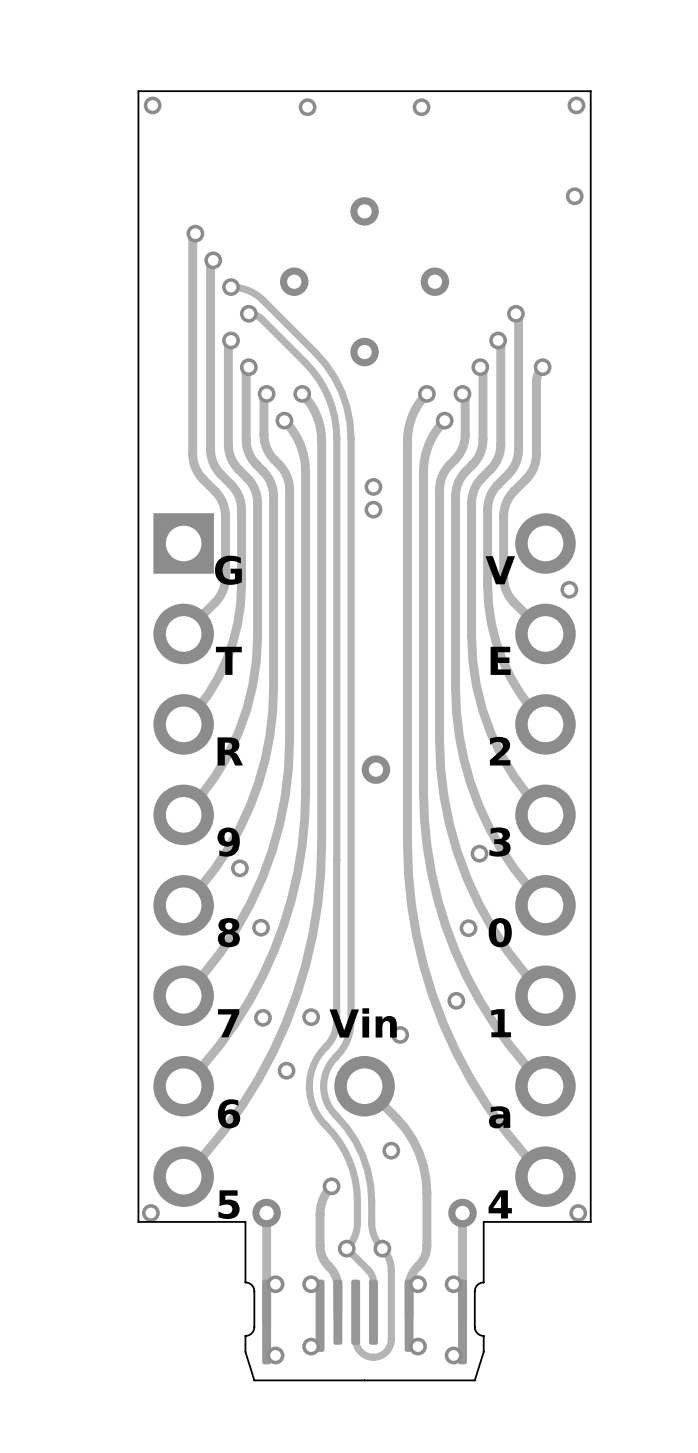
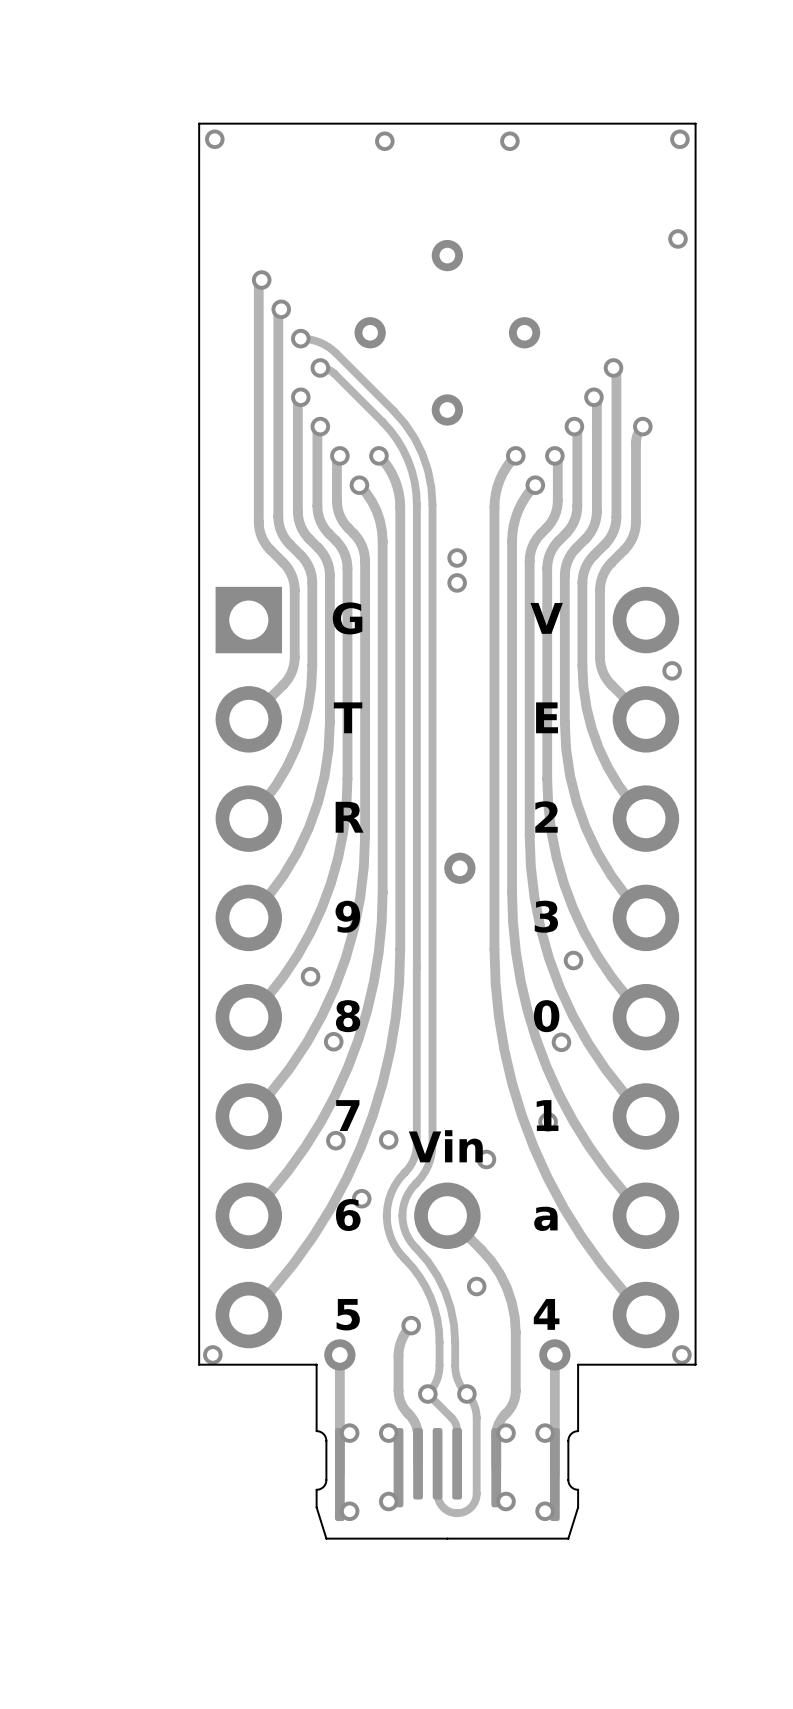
text position: G (228, 570) -> G (347, 618)
text position: V (500, 570) -> V (546, 618)
text position: T (228, 660) -> T (348, 717)
text position: E (500, 660) -> E (547, 717)
text position: R (230, 751) -> R (349, 817)
text position: 2 (500, 751) -> 2 (546, 816)
text position: 9 (228, 842) -> 9 (347, 916)
text position: 3 (500, 842) -> 3 (546, 916)
text position: 8 (228, 932) -> 8 (348, 1016)
text position: 0 (500, 932) -> 0 (546, 1016)
text position: 7 (228, 1023) -> 7 (347, 1115)
text position: 1 (501, 1023) -> 1 (547, 1115)
text position: 6 (229, 1113) -> 6 (348, 1215)
text position: a (499, 1117) -> a (545, 1218)
text position: 5 (229, 1204) -> 5 (348, 1314)
text position: 4 (500, 1204) -> 4 (546, 1314)

